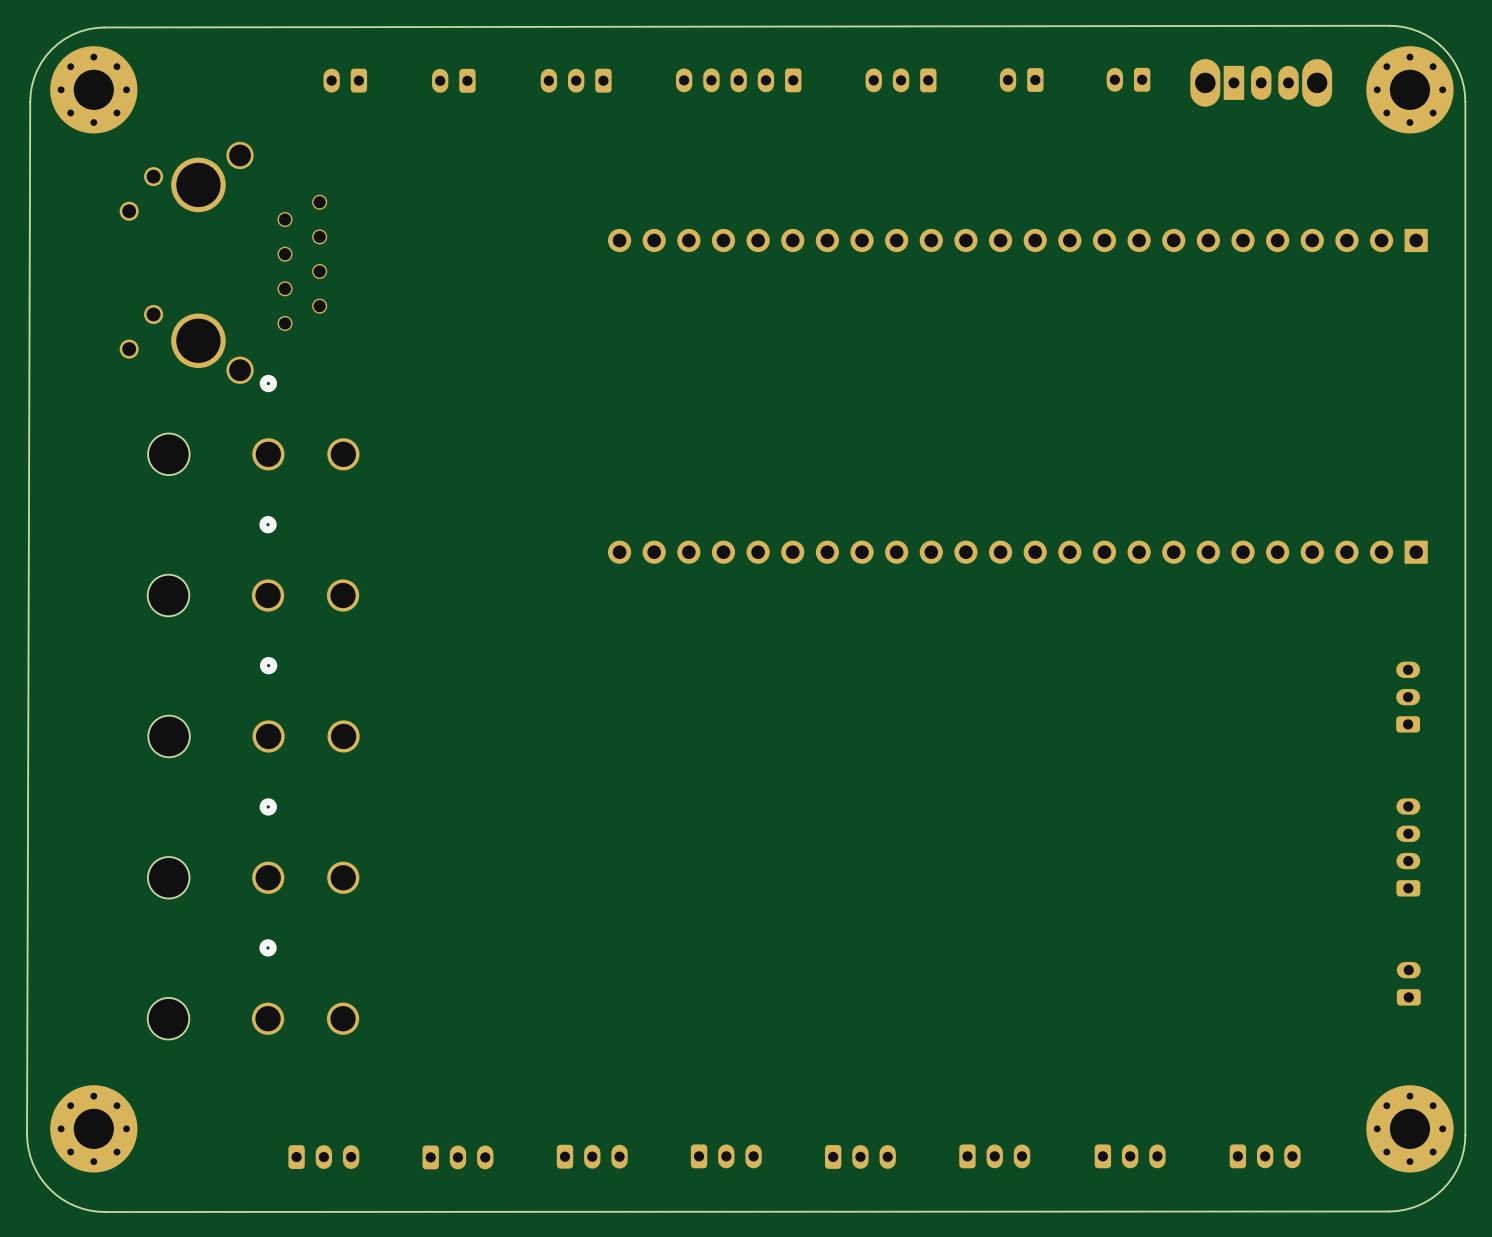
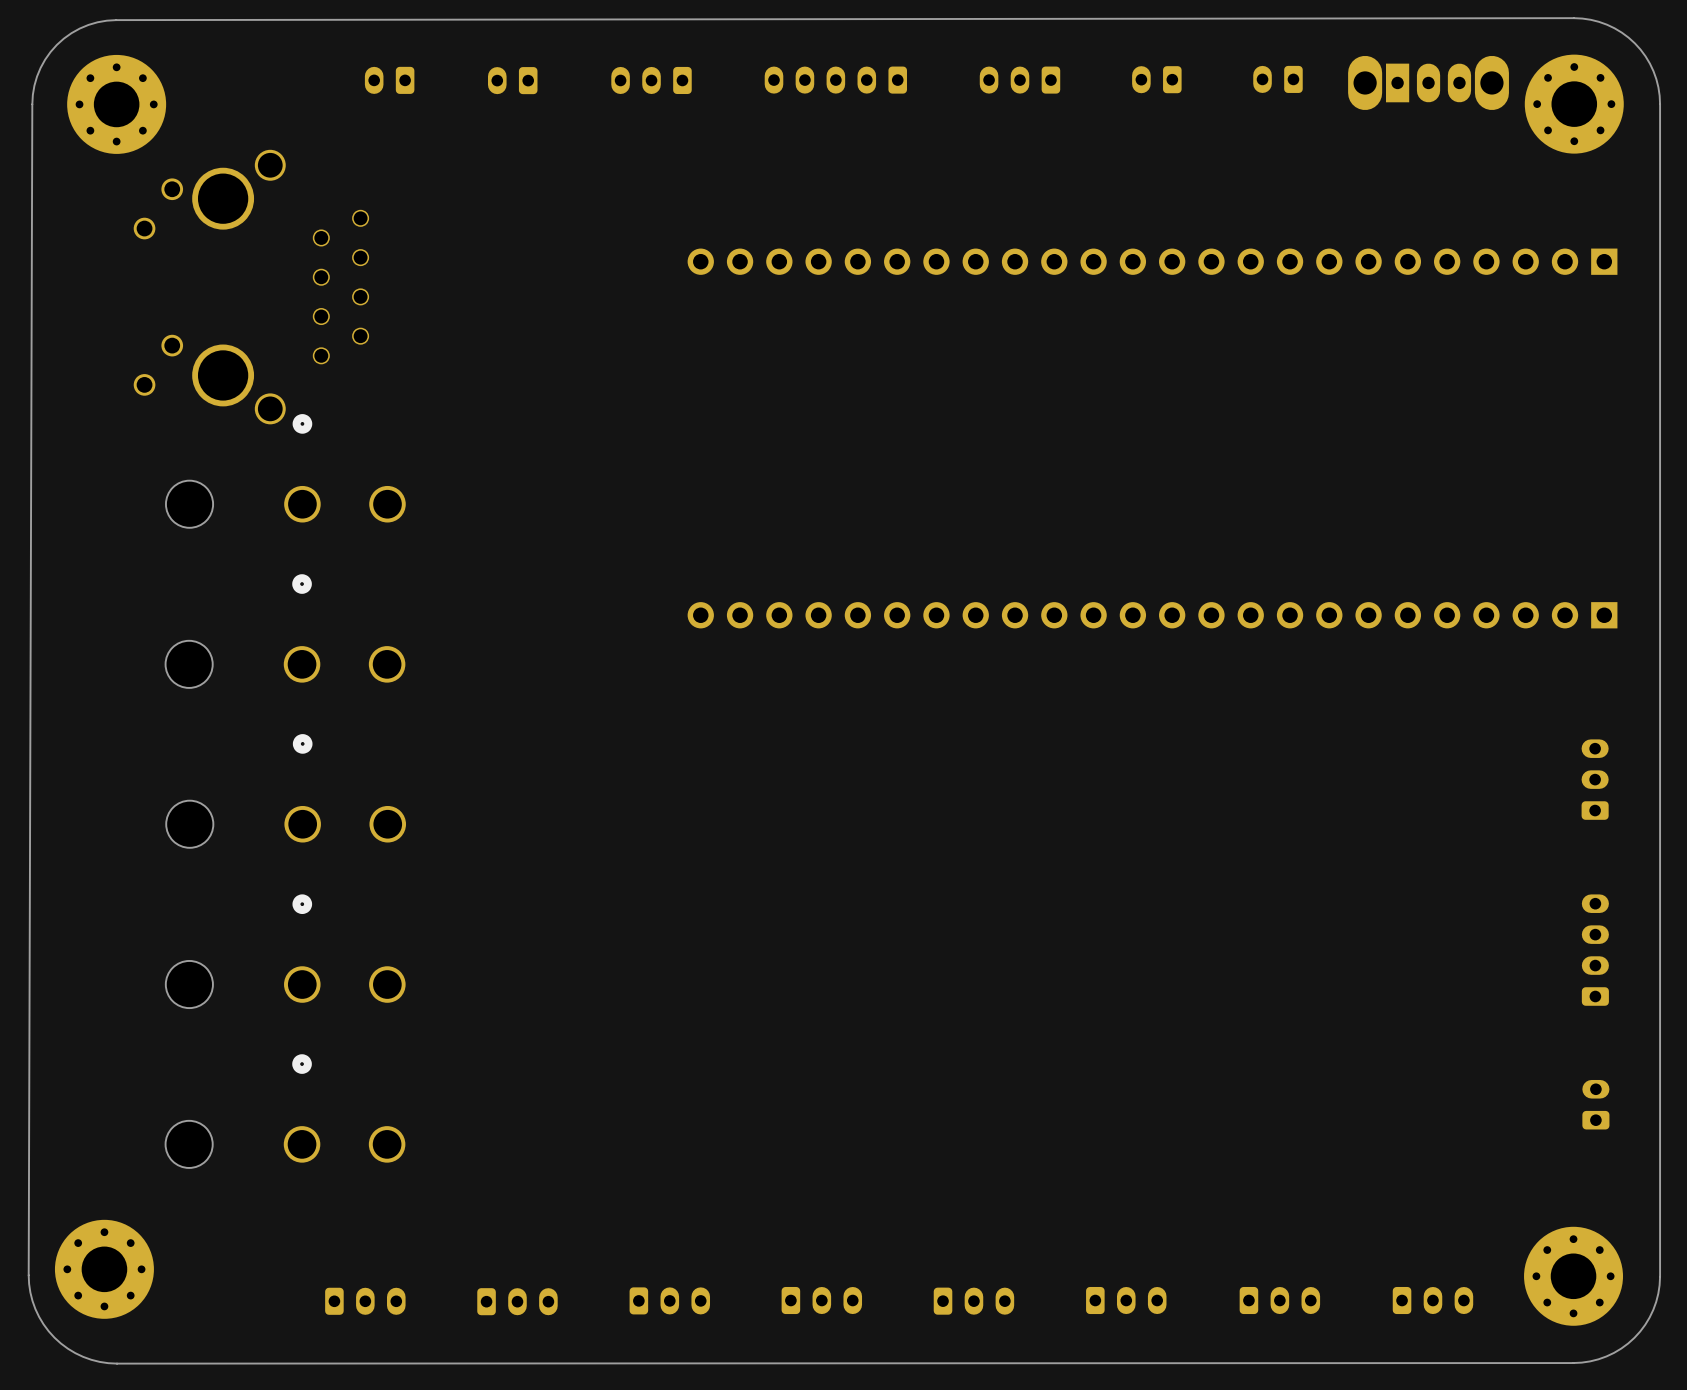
part position: (93, 89) -> (116, 104)
part position: (1409, 89) -> (1574, 104)
part position: (1409, 1128) -> (1573, 1276)

